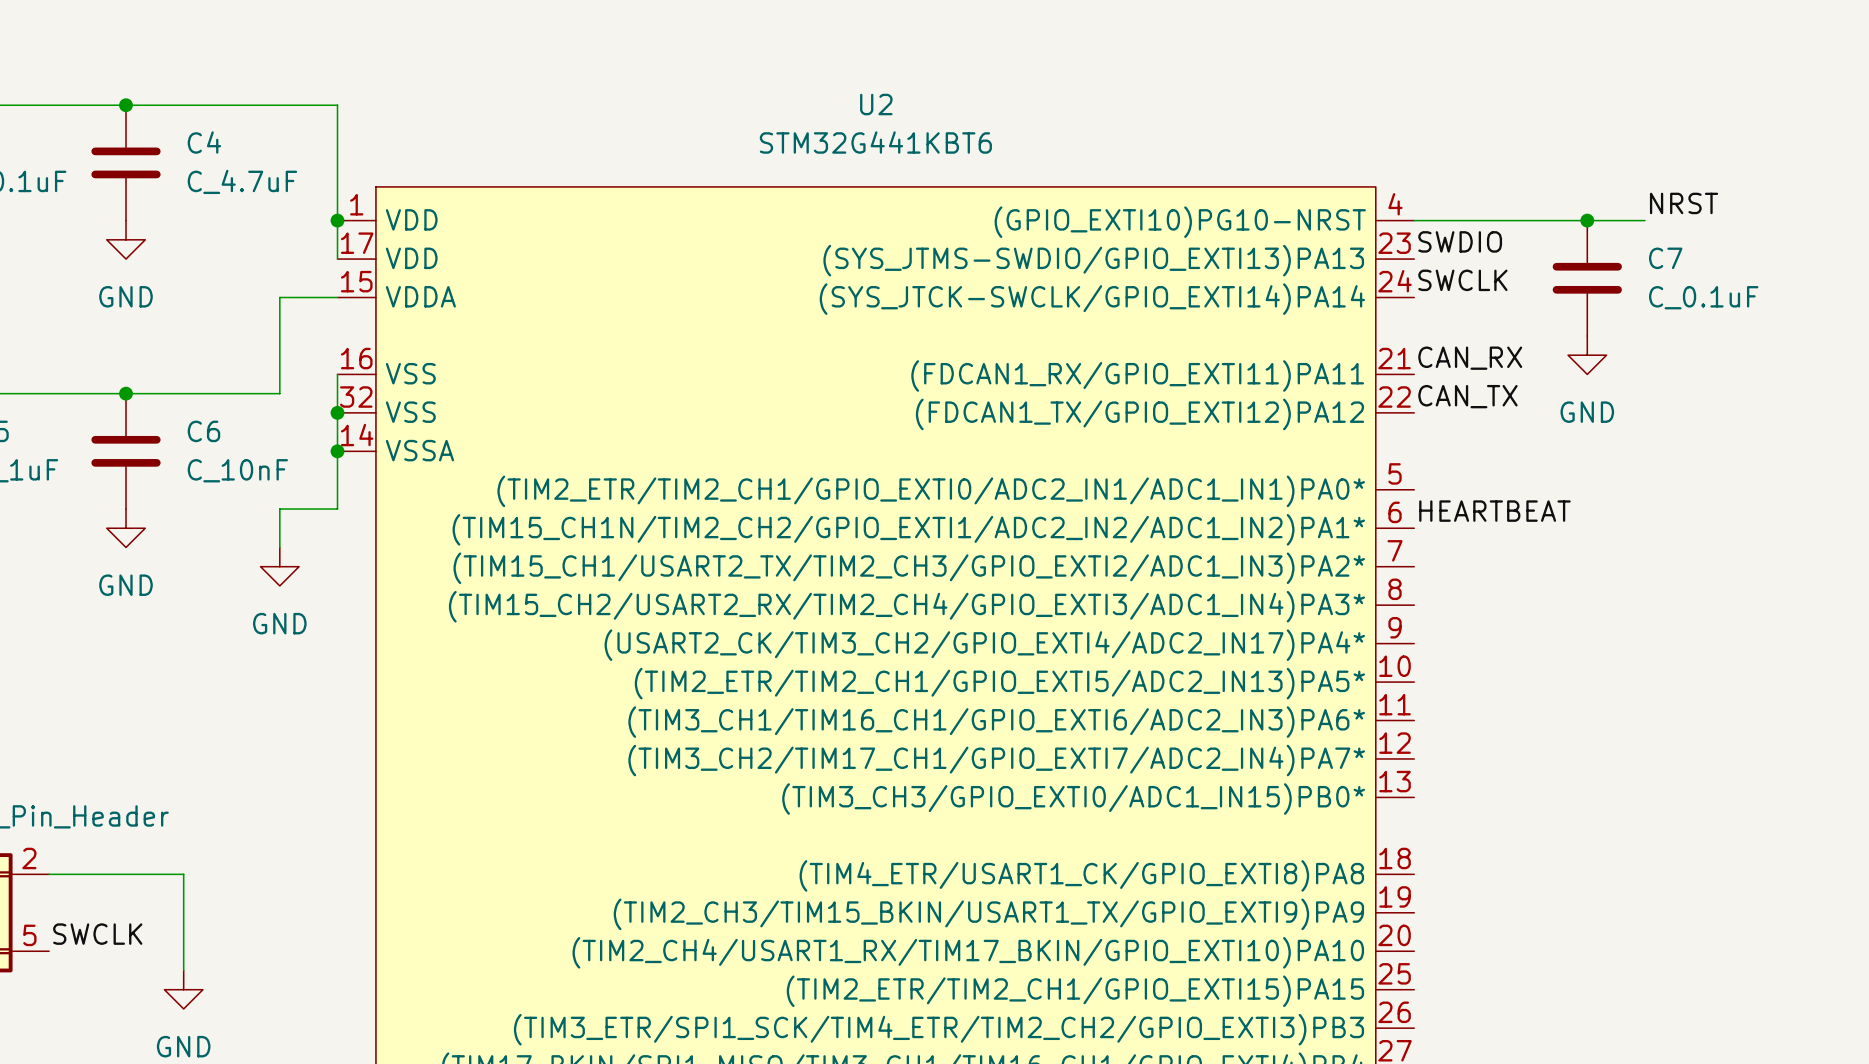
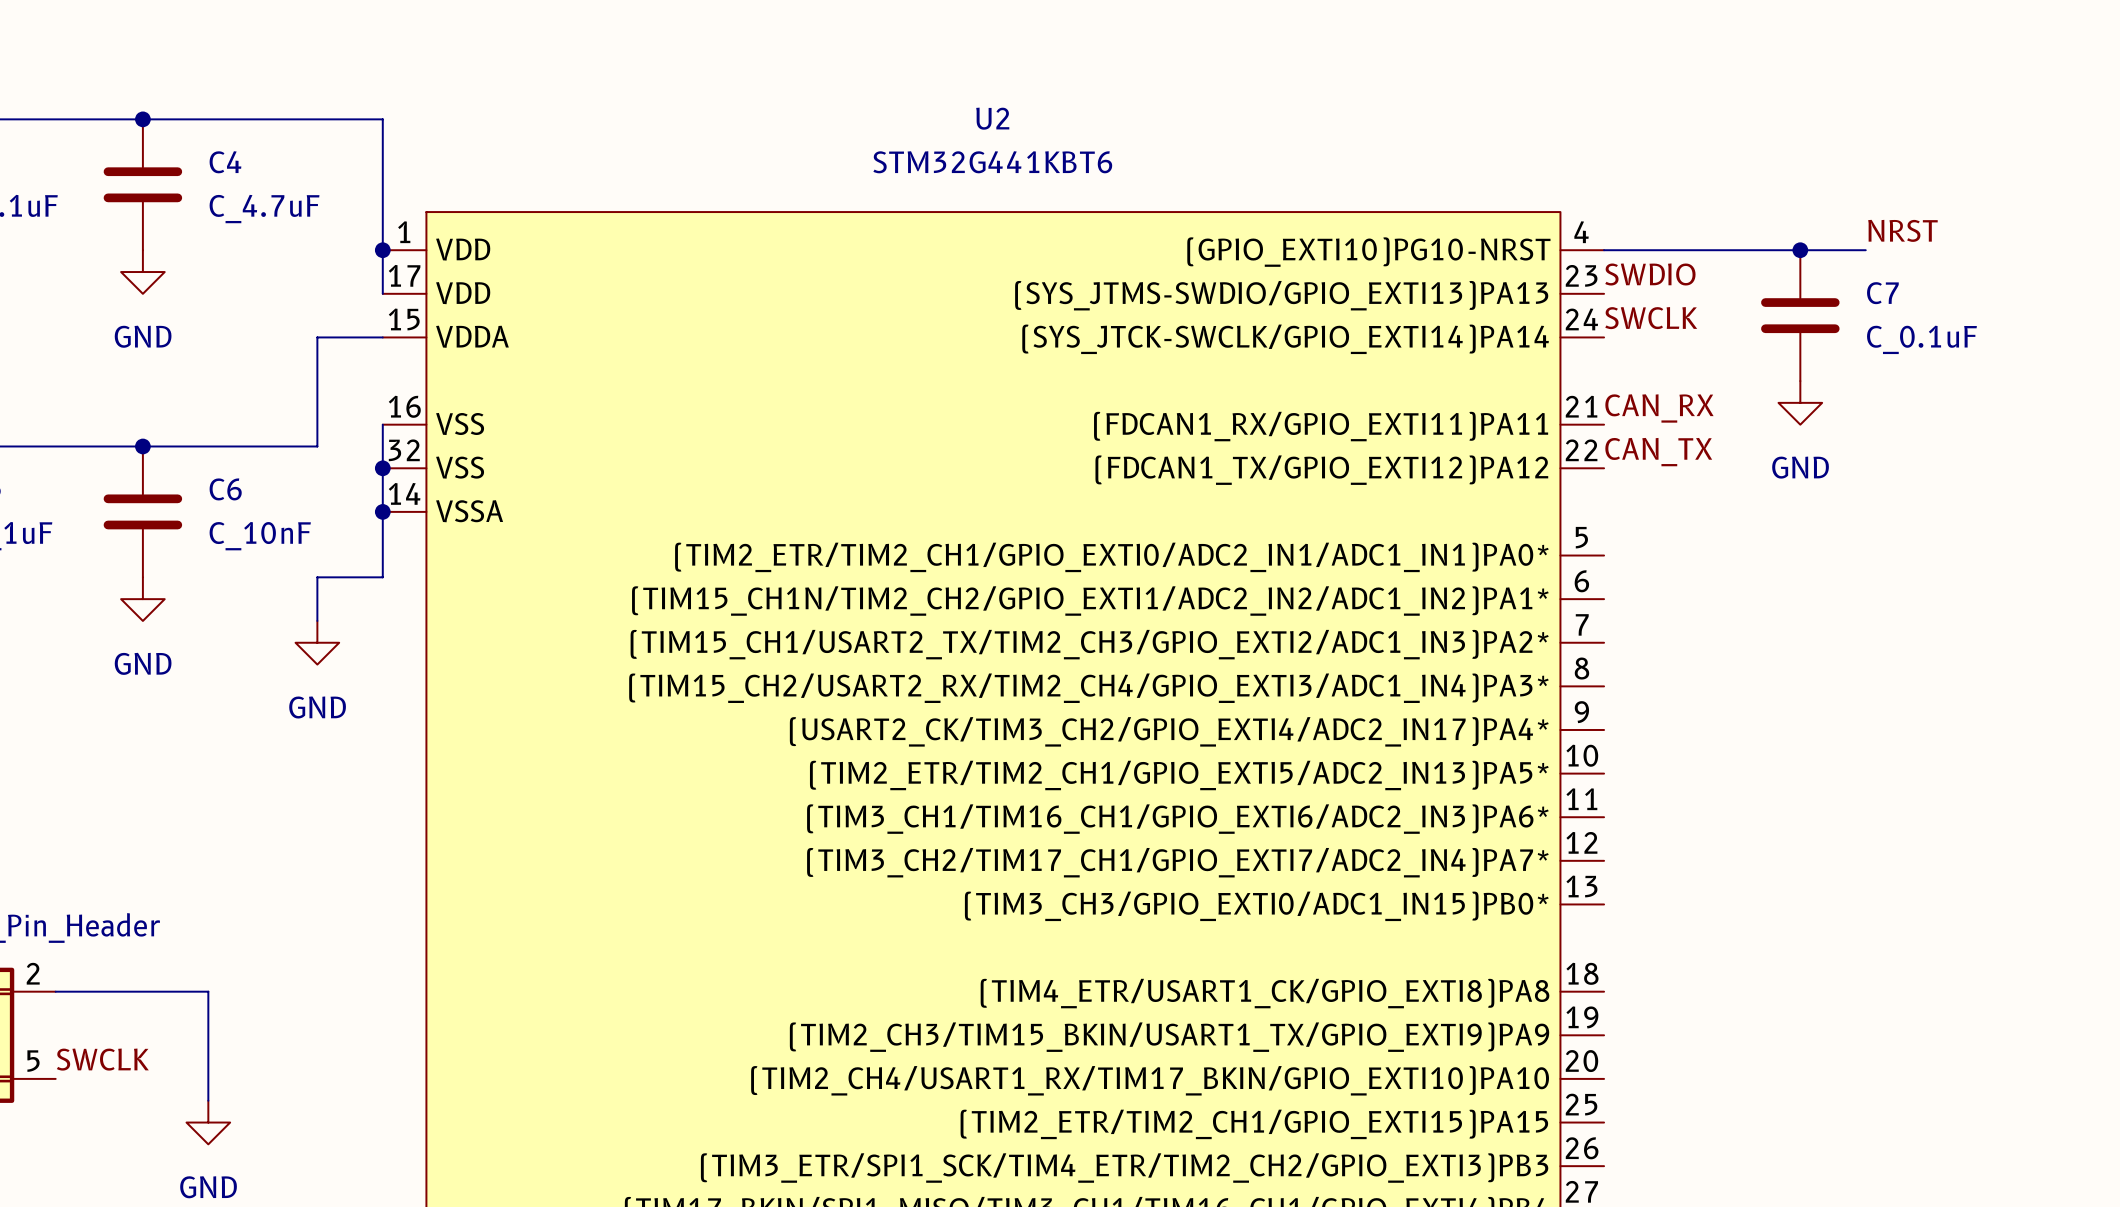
label: HEARTBEAT (1494, 511) -> none

